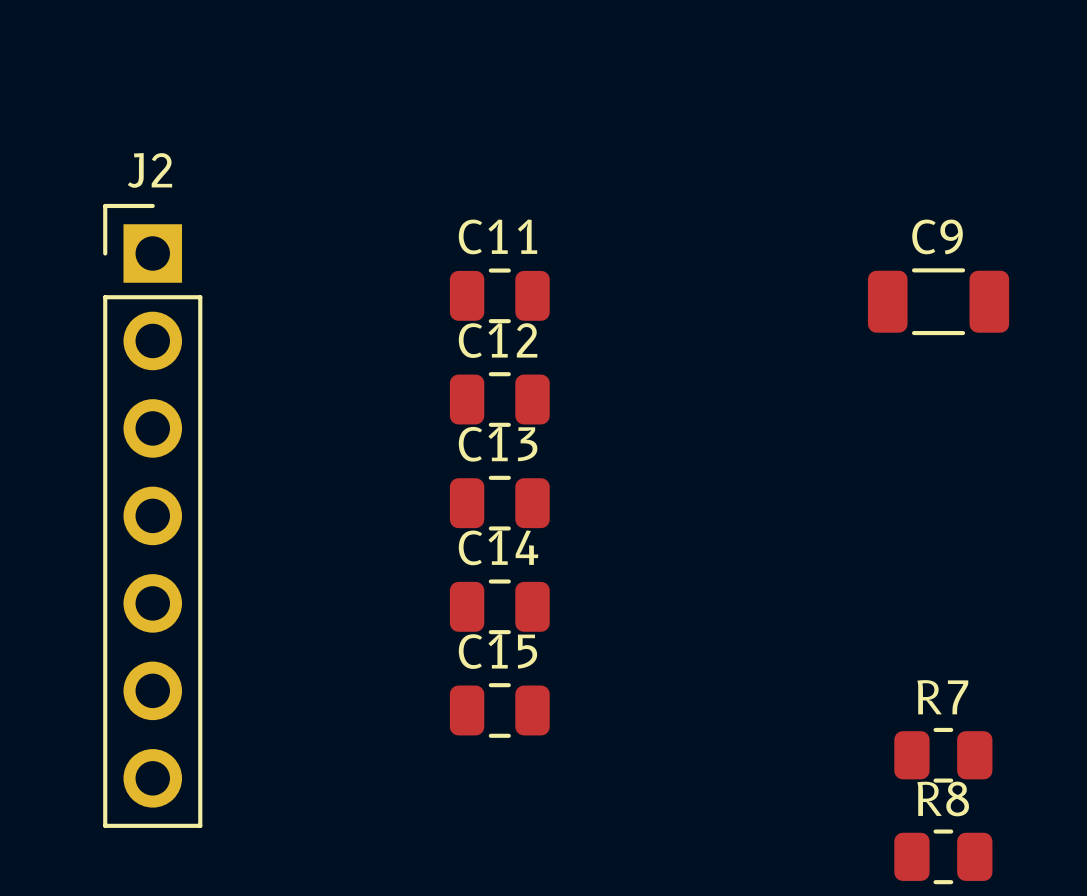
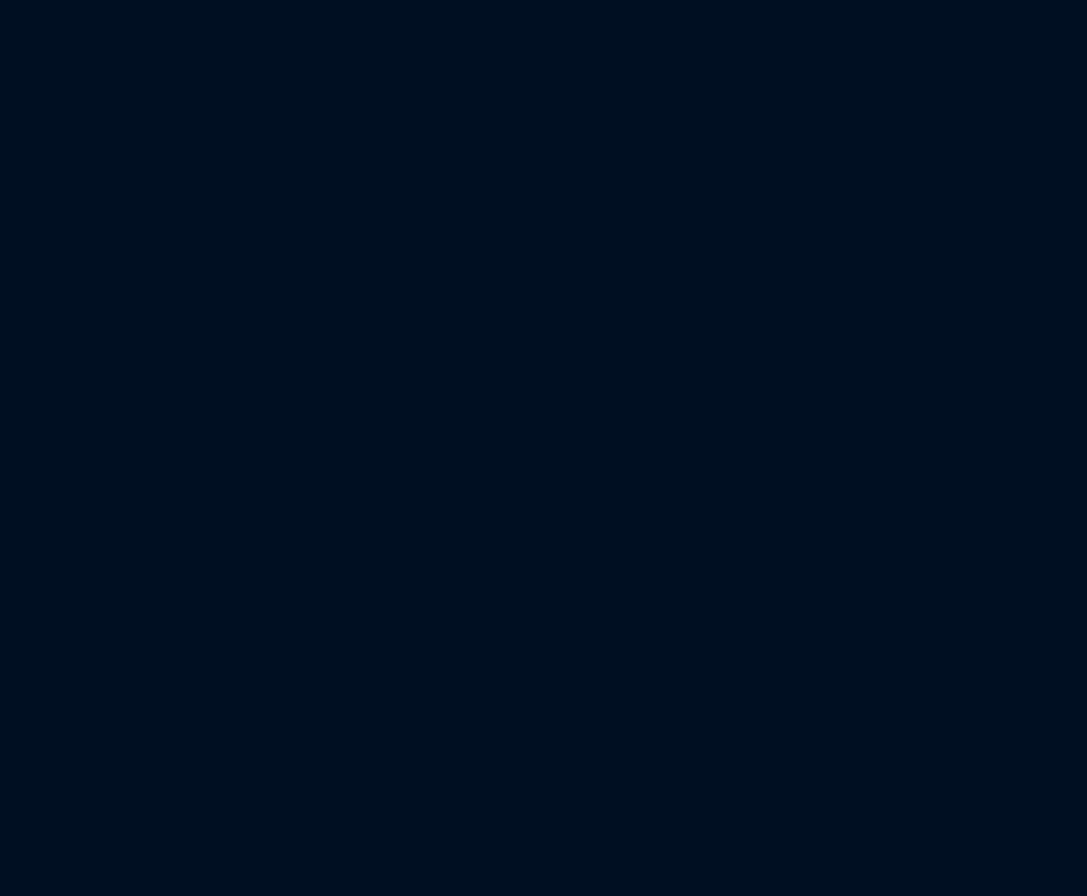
C11: (499, 295) -> none
C9: (938, 301) -> none
C12: (499, 399) -> none
C13: (499, 503) -> none
J2: (152, 515) -> none
C14: (499, 606) -> none
C15: (499, 710) -> none
R7: (943, 755) -> none
R8: (943, 856) -> none

